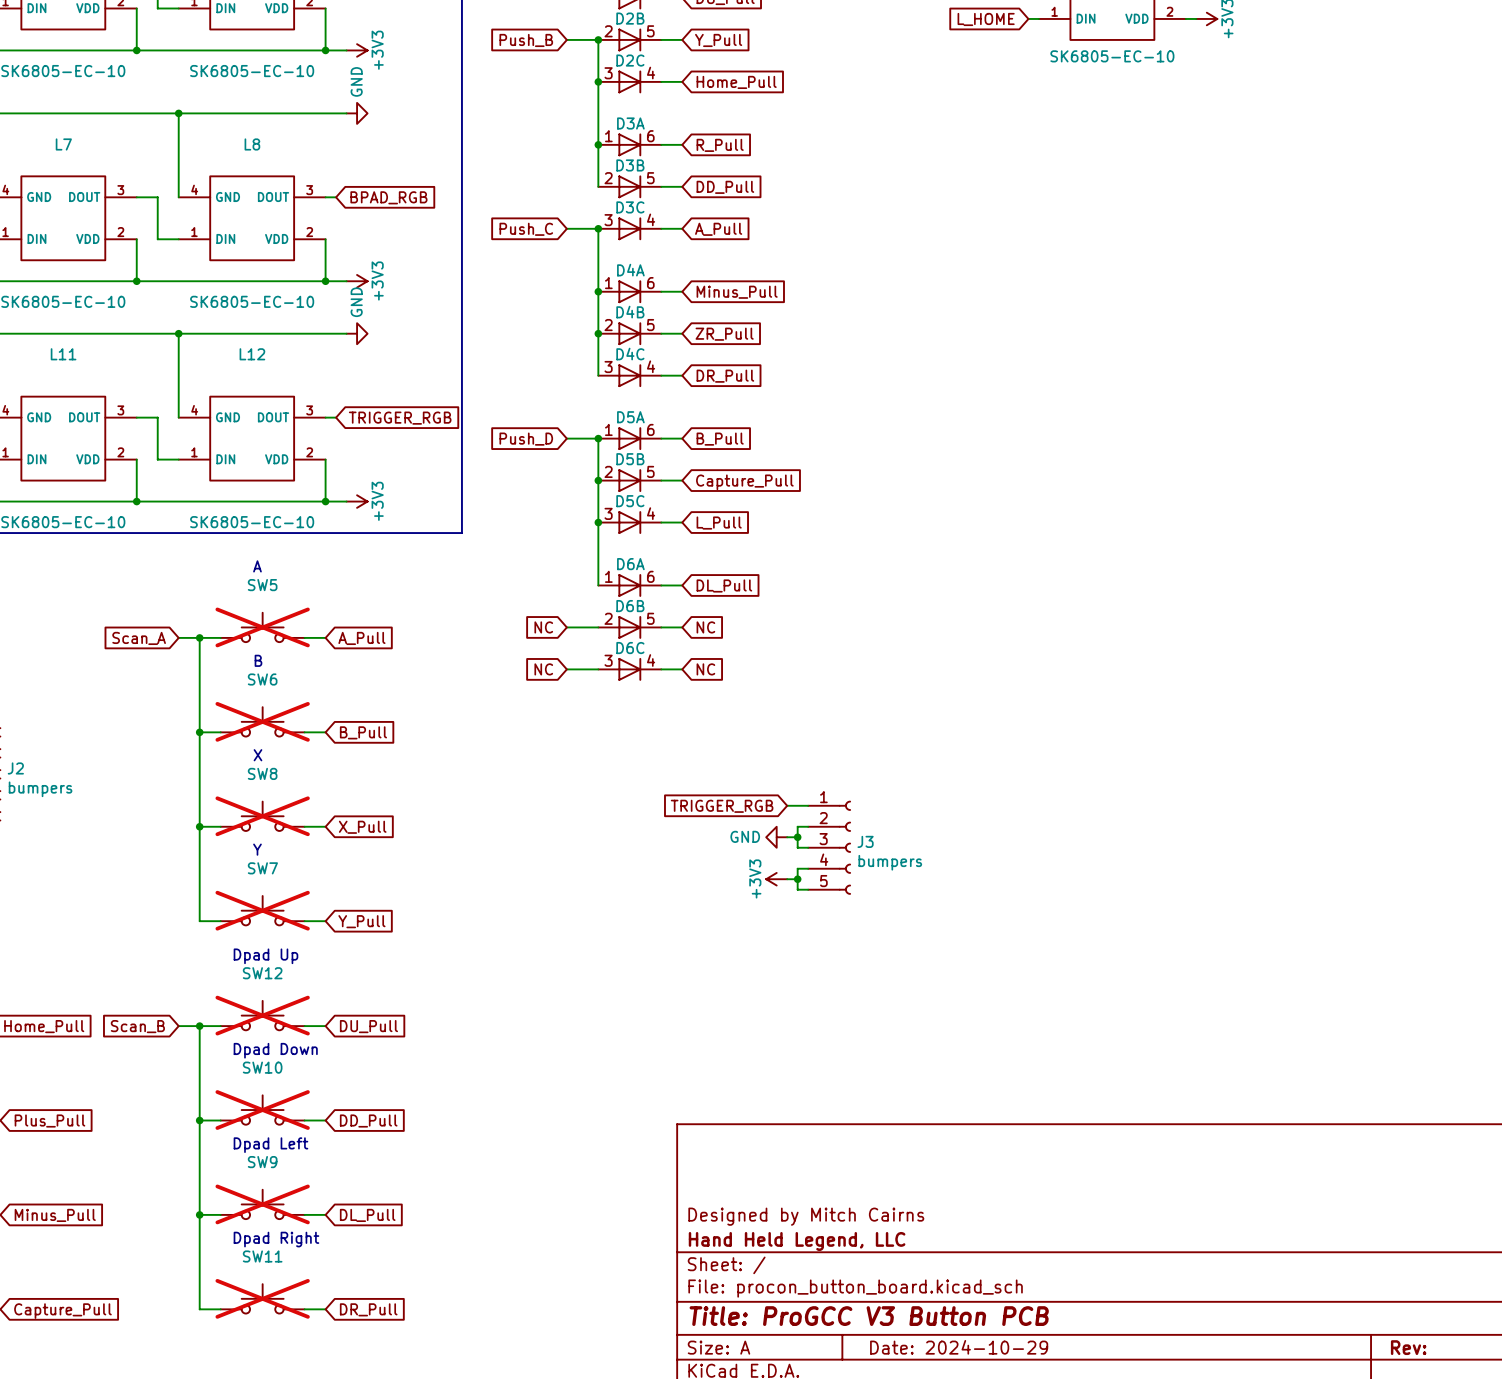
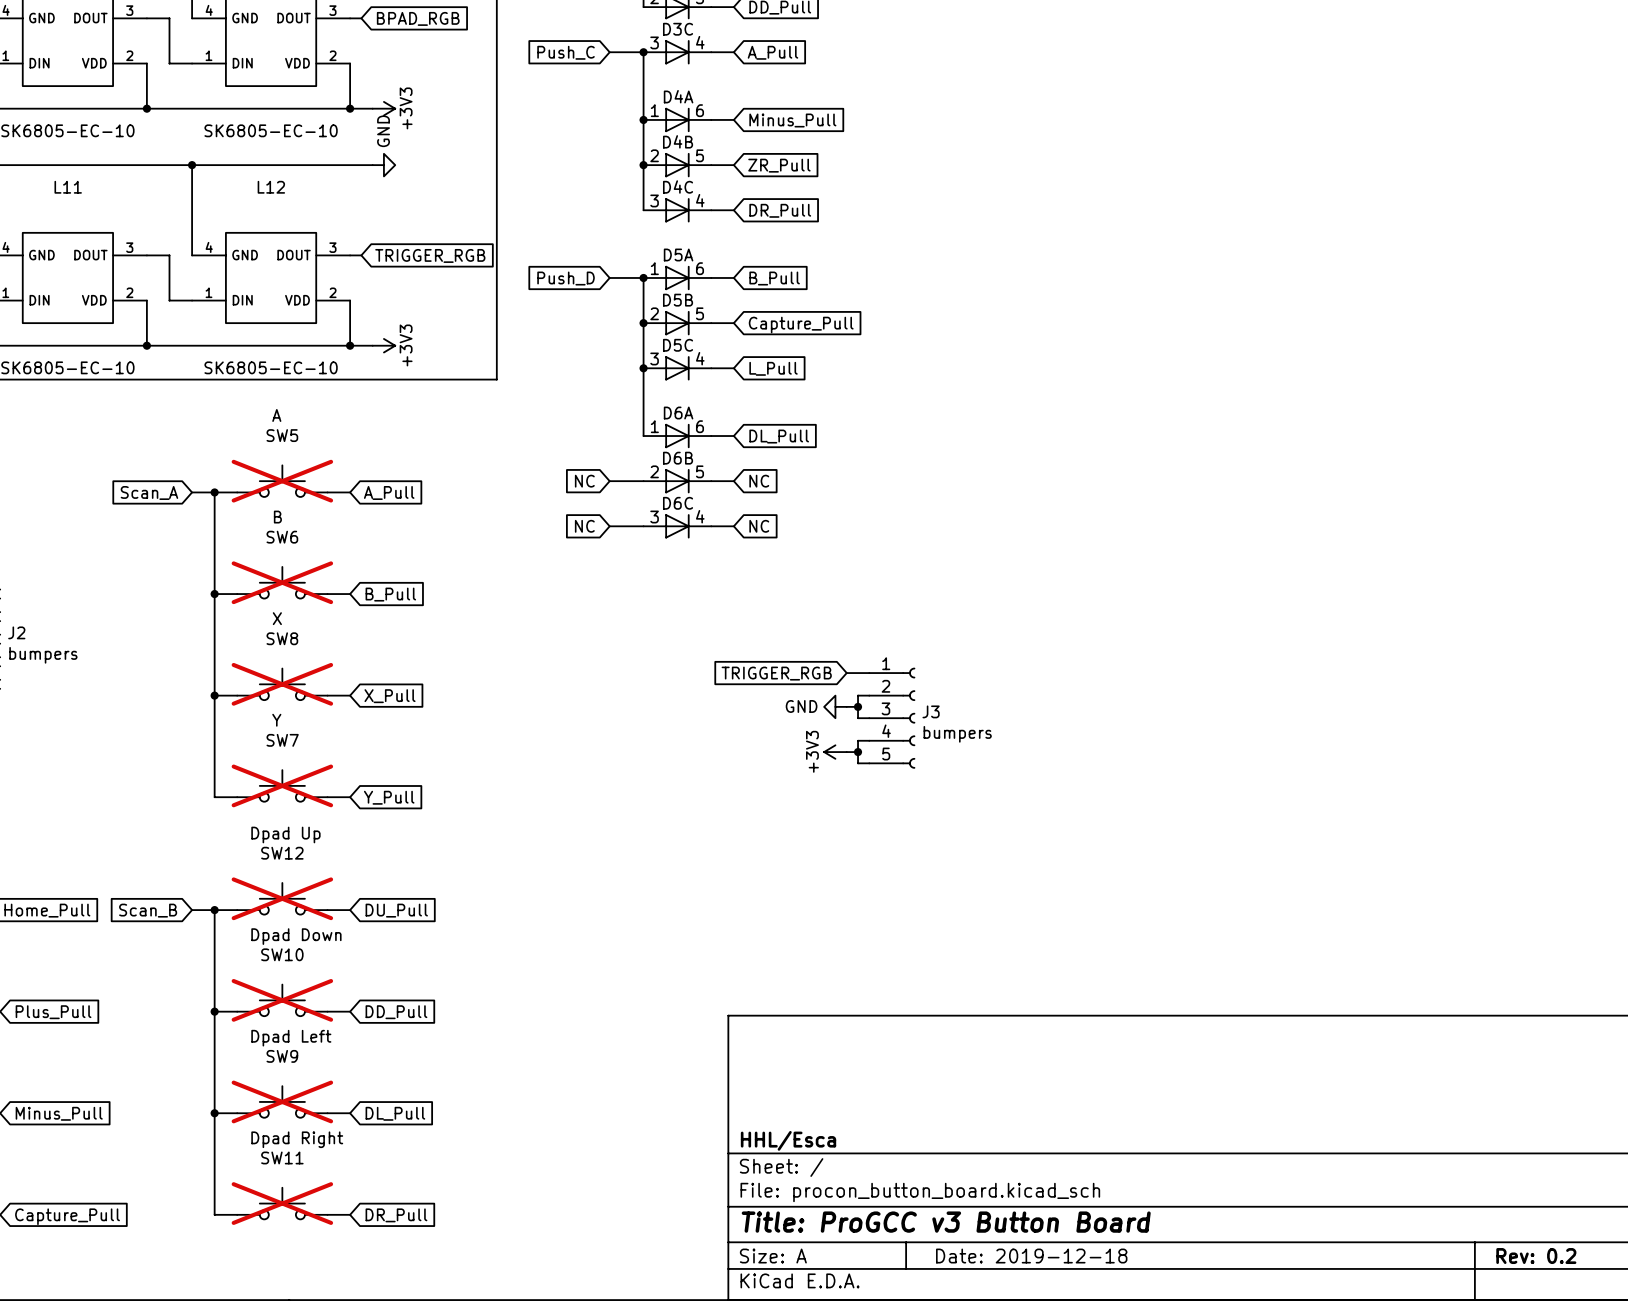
title block: Designed by Mitch Cairns (806, 1216) -> none
title block: Hand Held Legend, LLC (797, 1241) -> HHL/Esca (788, 1140)
title block: Title: ProGCC V3 Button PCB (869, 1316) -> Title: ProGCC v3 Button Board (946, 1222)
title block: Date: 2024-10-29 (959, 1347) -> Date: 2019-12-18 (1031, 1256)
title block: Rev: (1408, 1347) -> Rev: 0.2 (1536, 1256)

